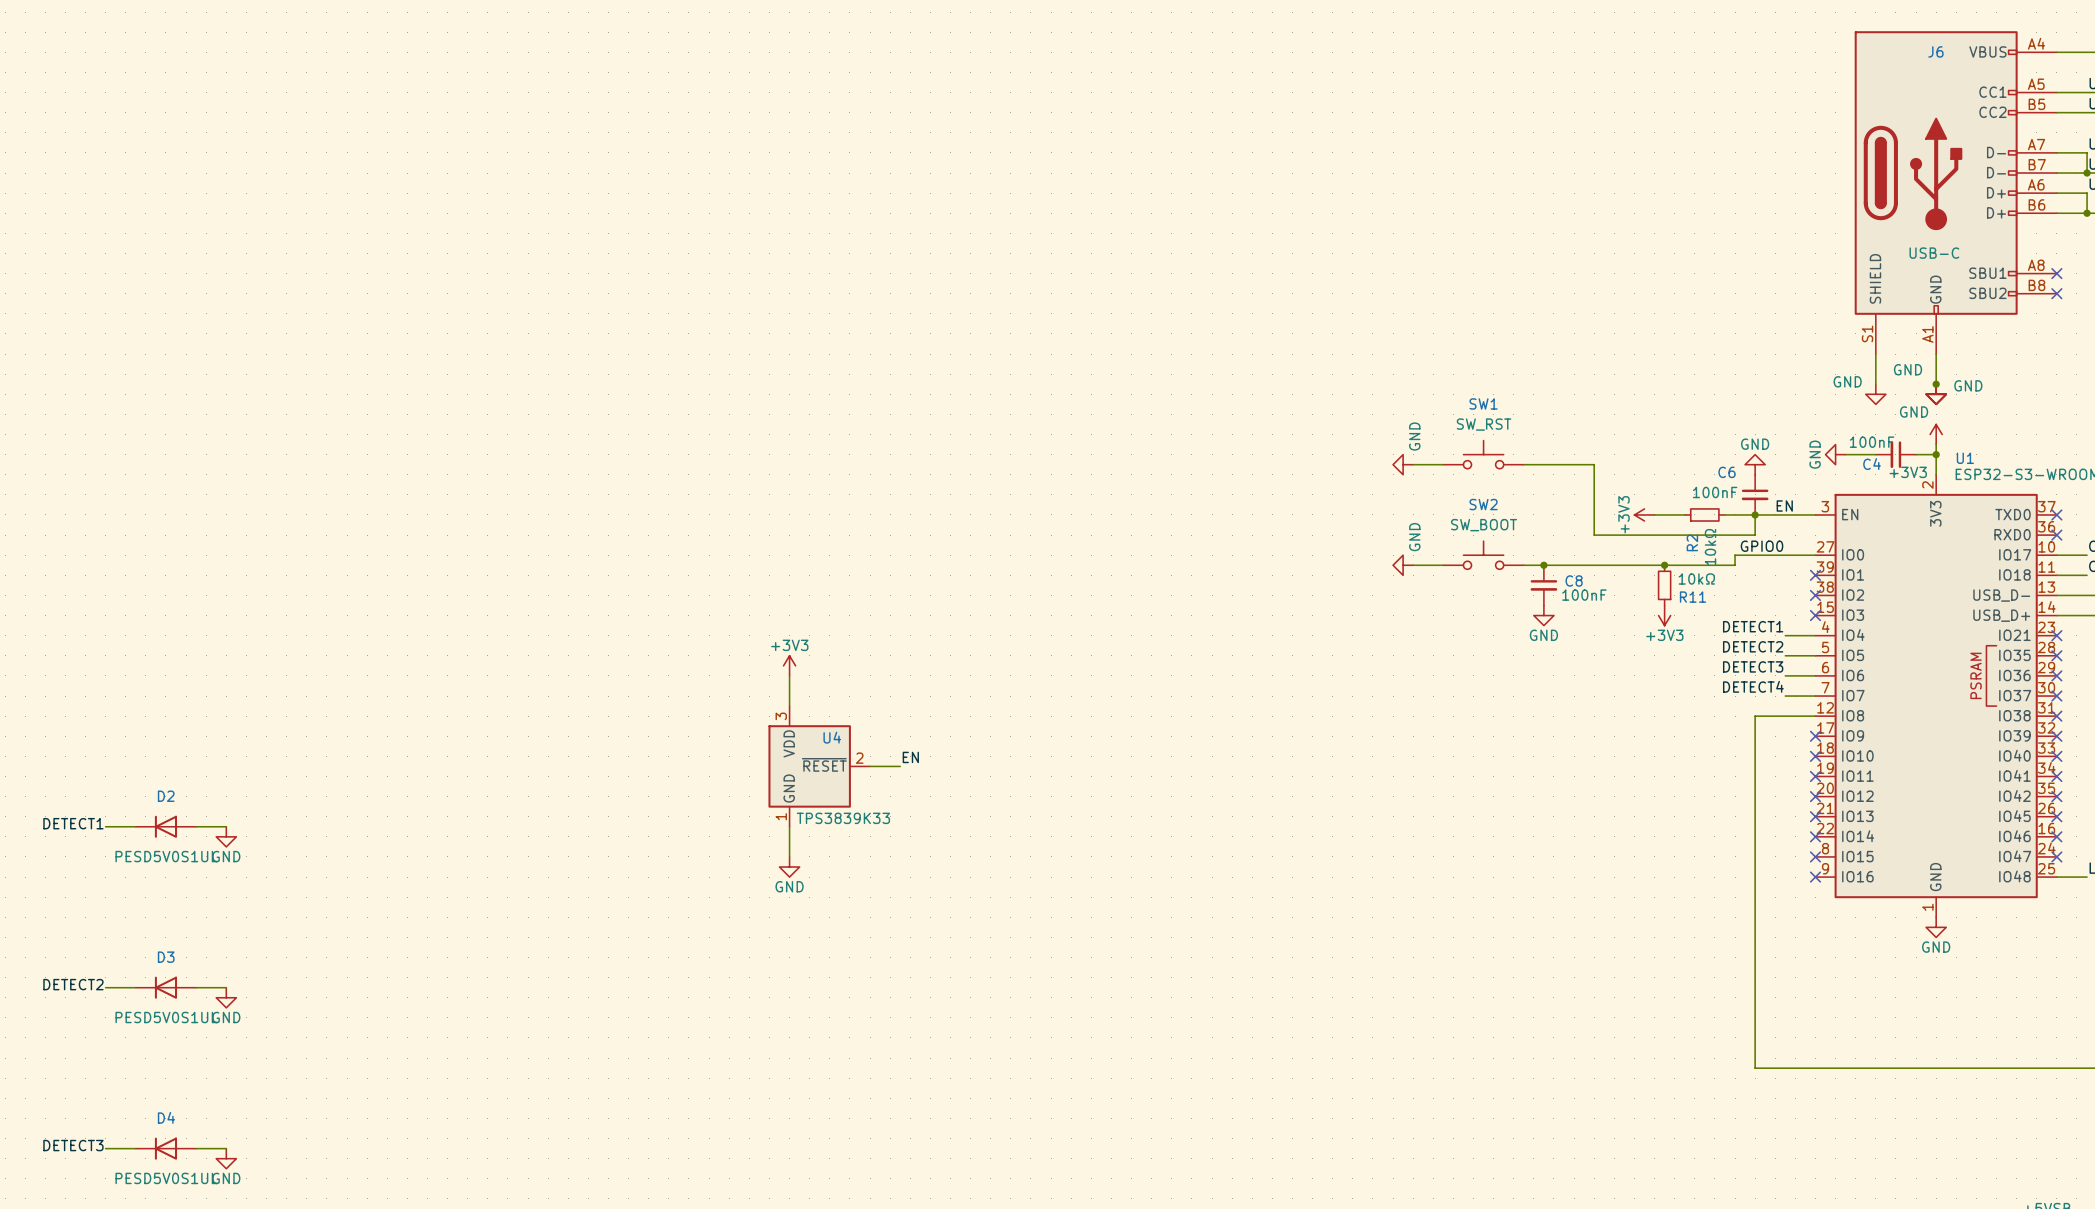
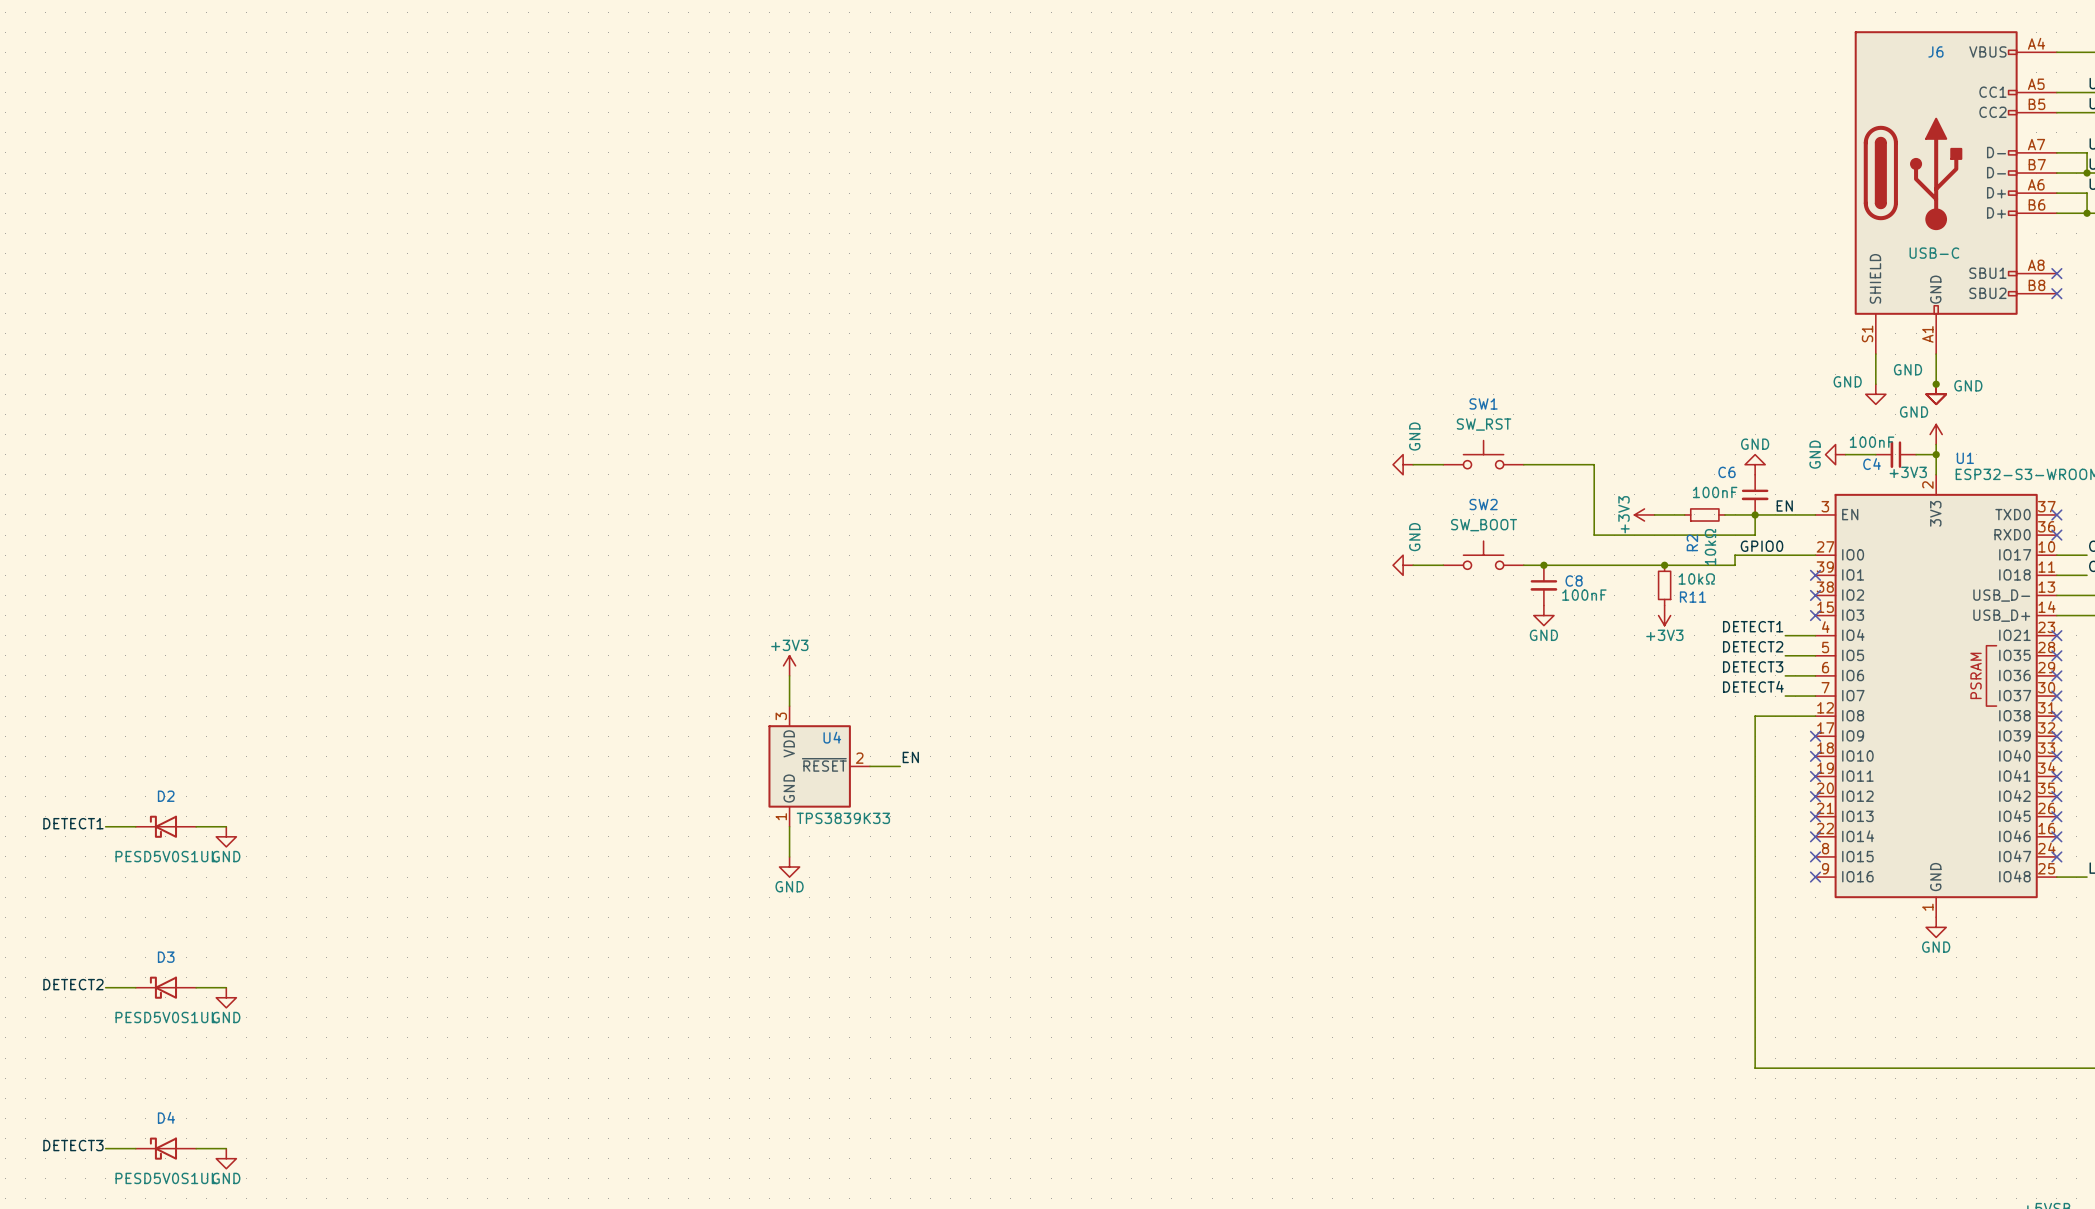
D2 symbol: [135, 815, 197, 838] -> [135, 815, 197, 838]
D3 symbol: [135, 976, 197, 999] -> [135, 976, 197, 999]
D4 symbol: [135, 1137, 197, 1160] -> [135, 1137, 197, 1160]

